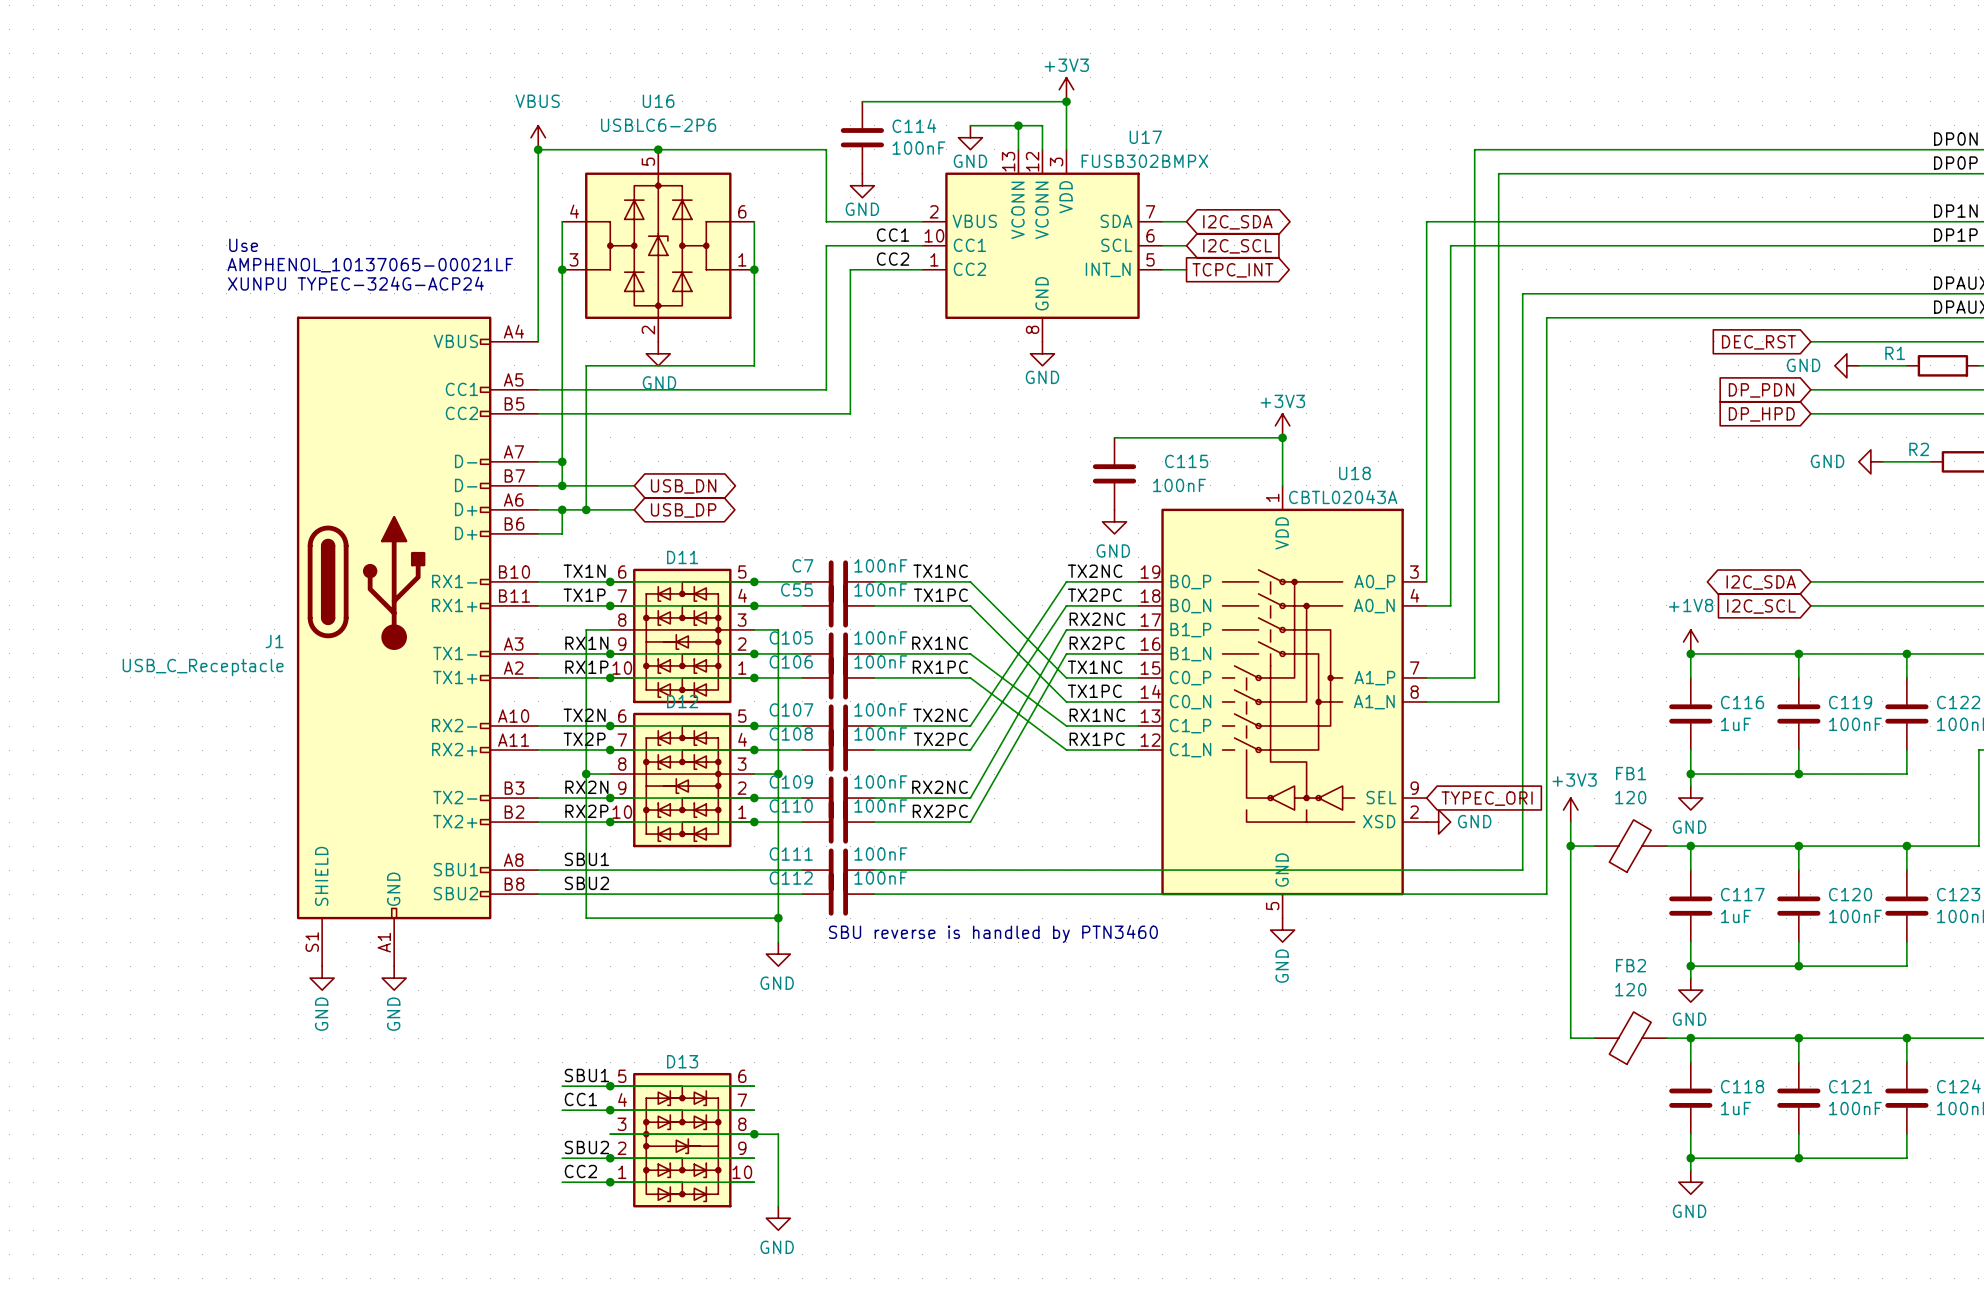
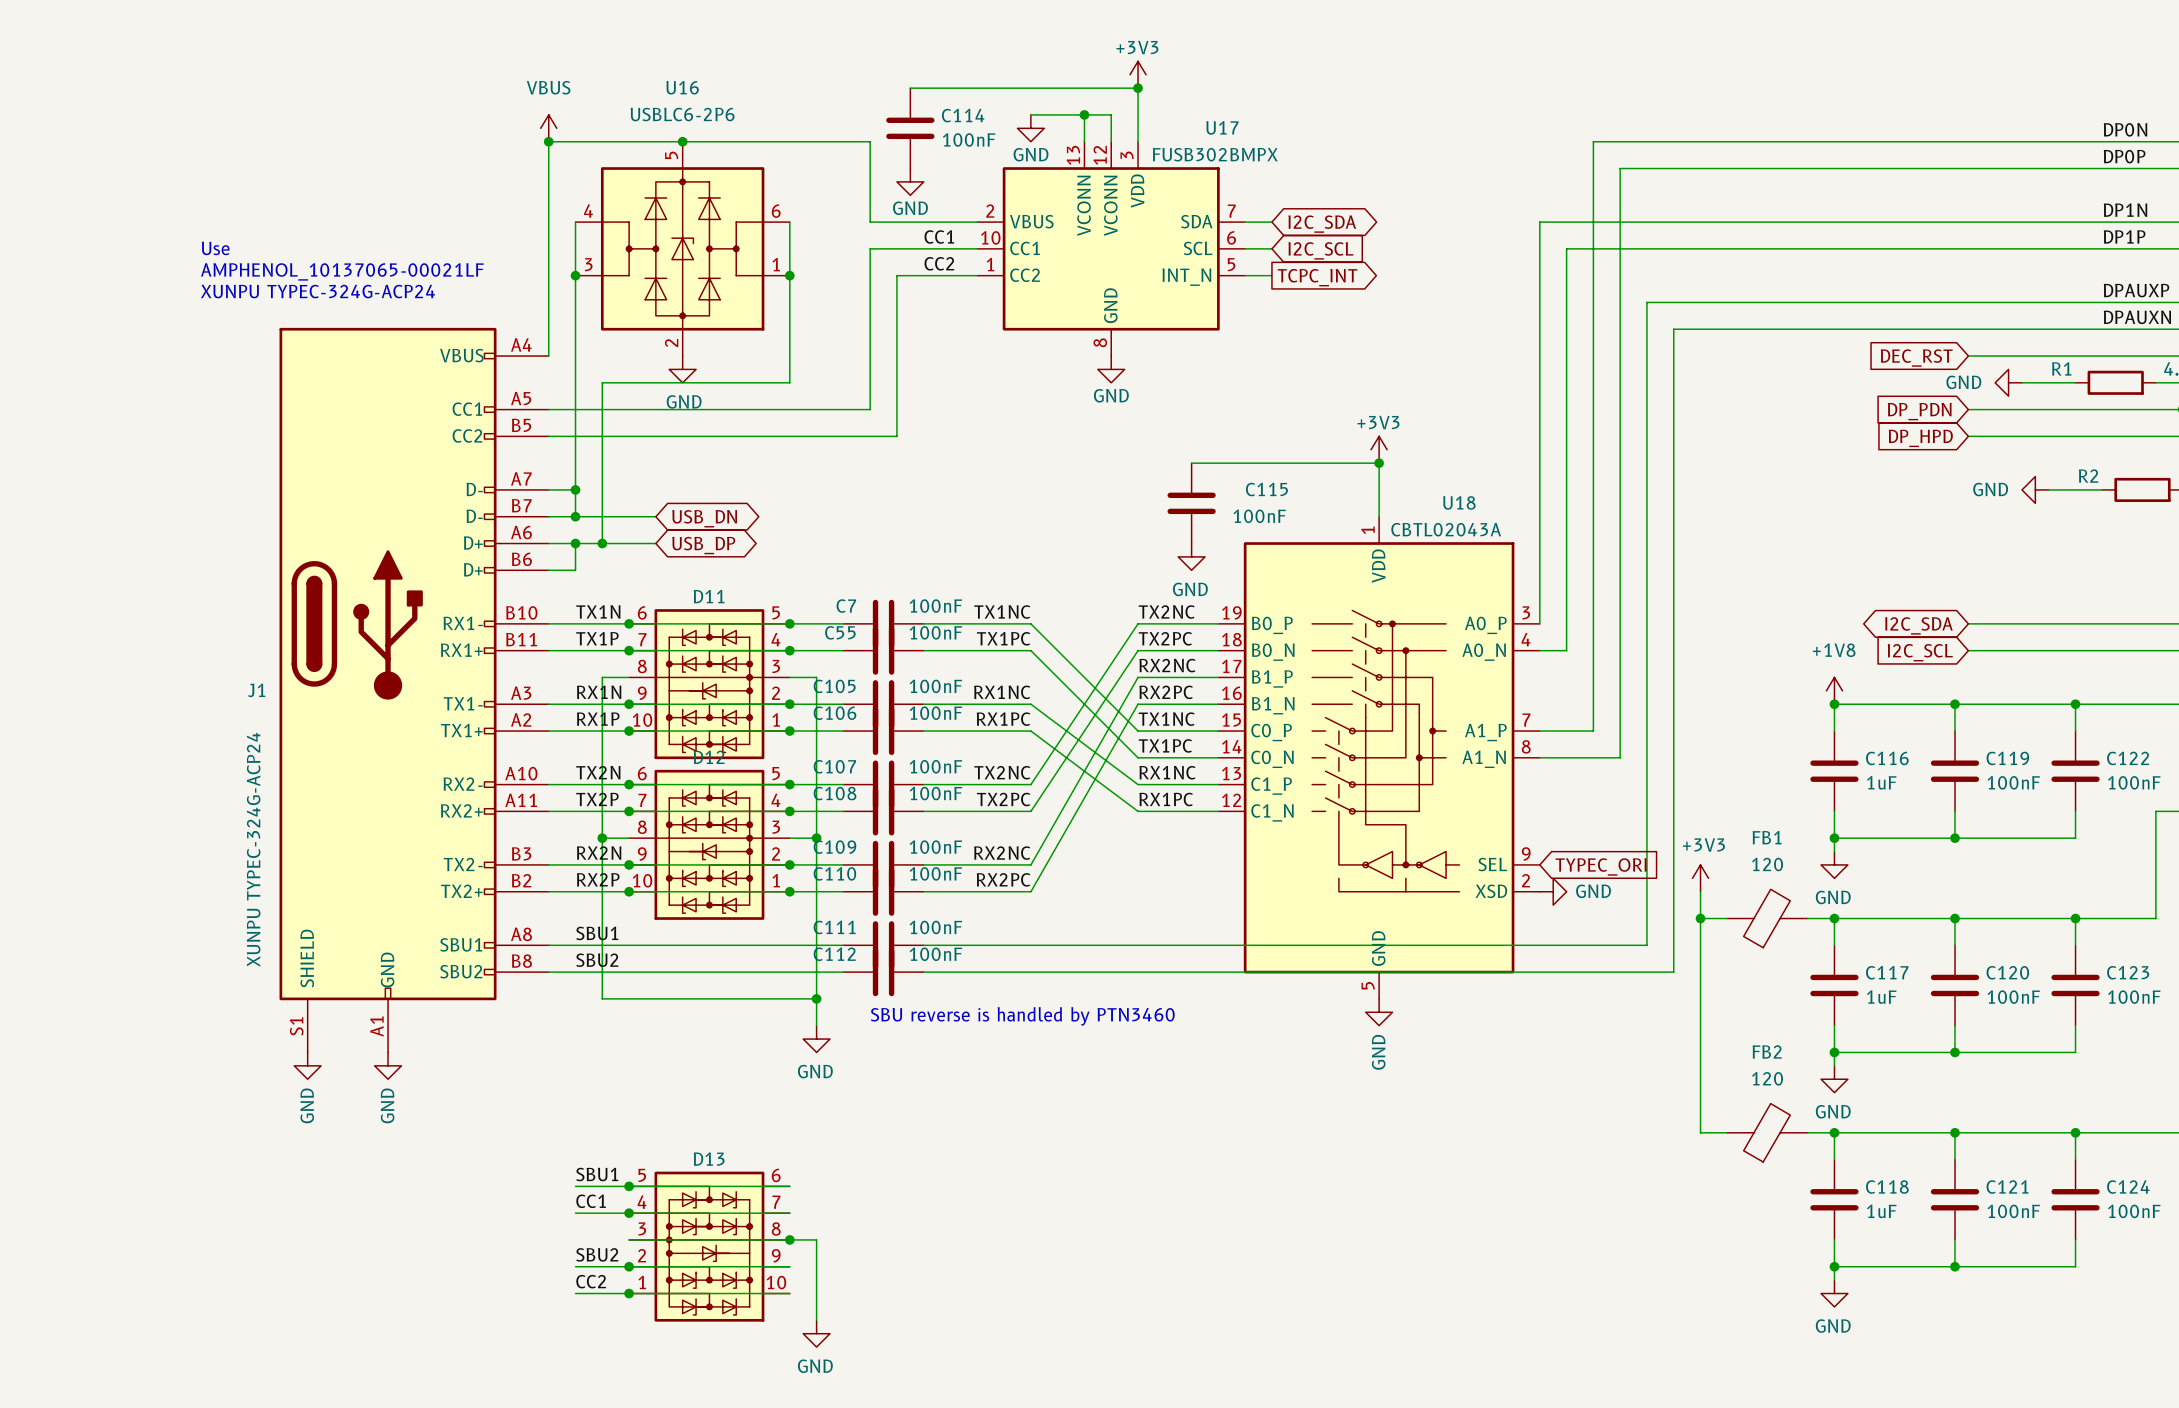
J1 value: USB_C_Receptacle (203, 667) -> XUNPU TYPEC-324G-ACP24 (253, 849)

